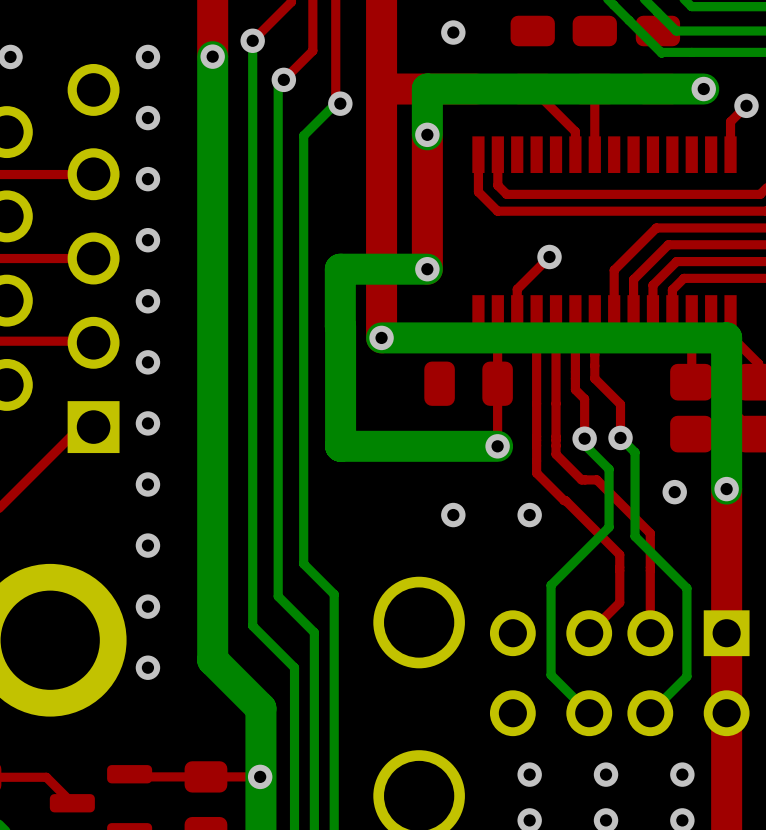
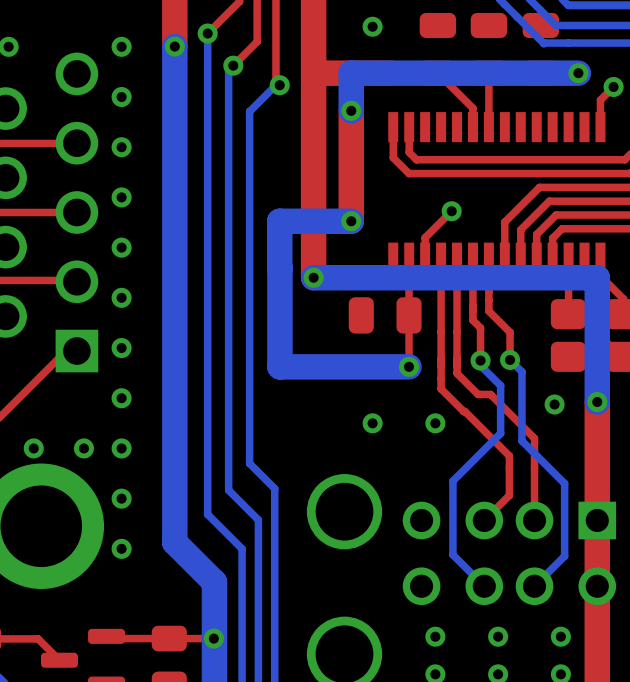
via: none -> (33, 448)
via: none -> (83, 448)

